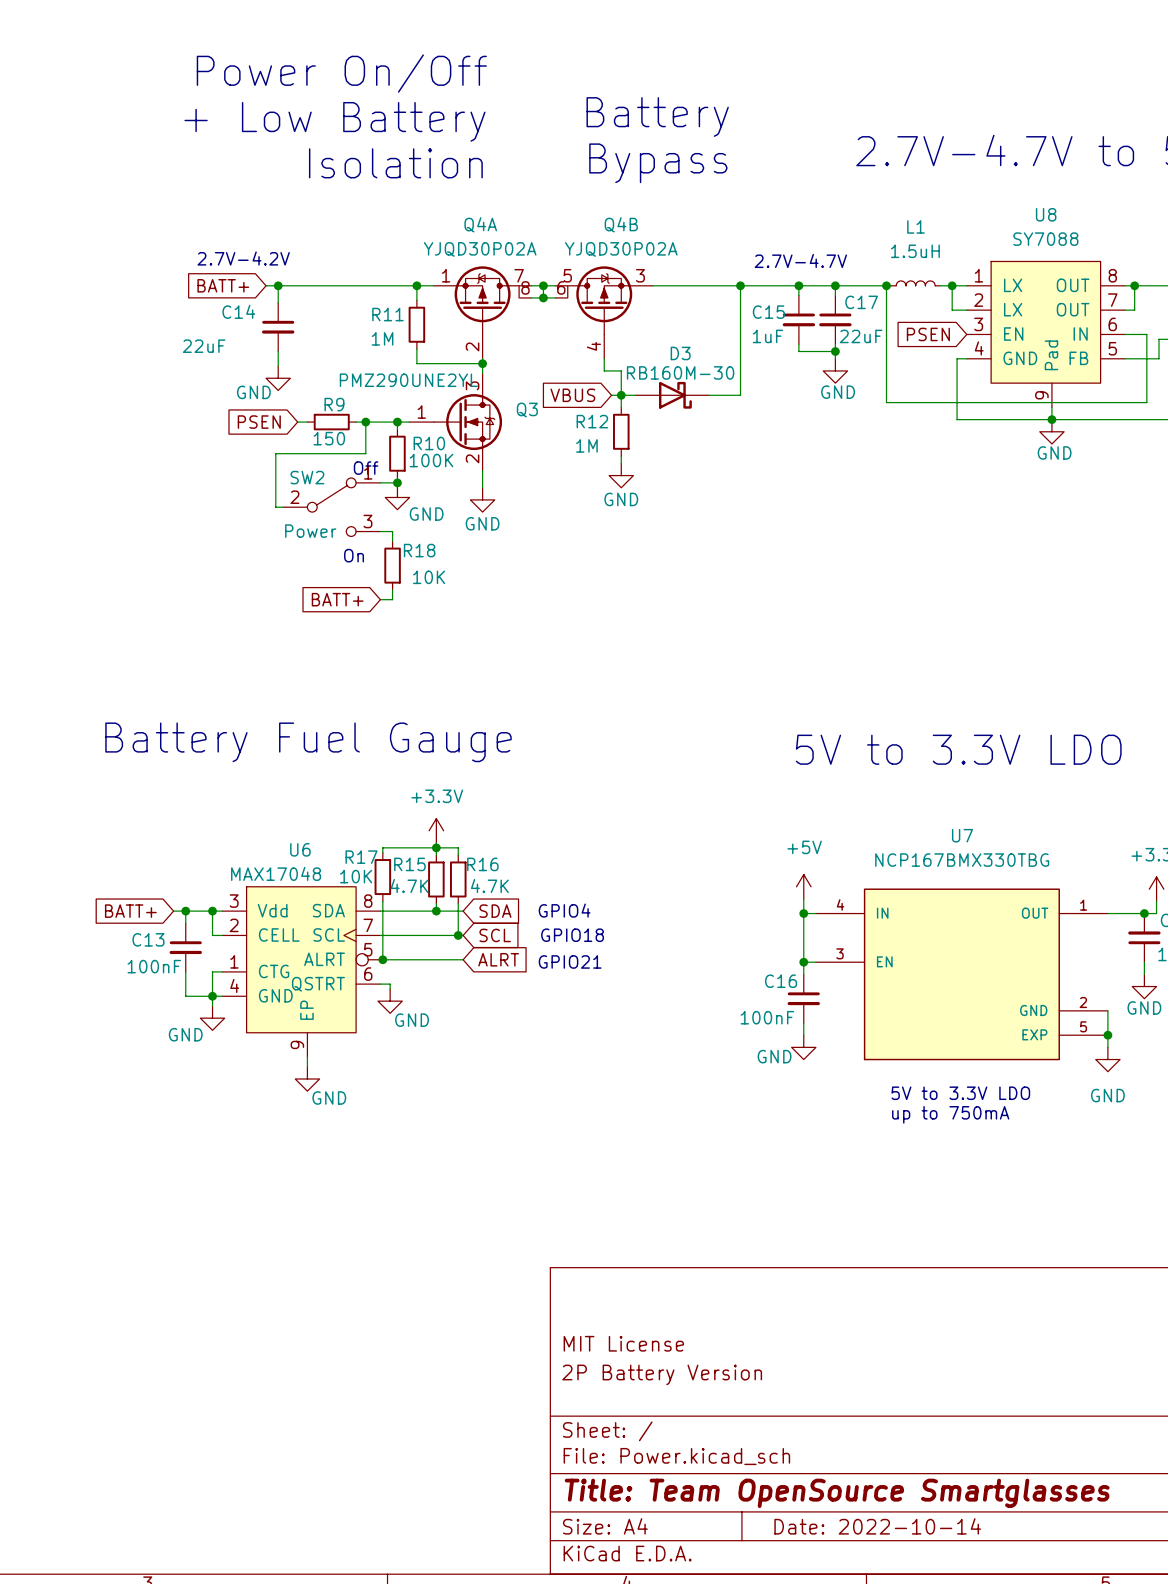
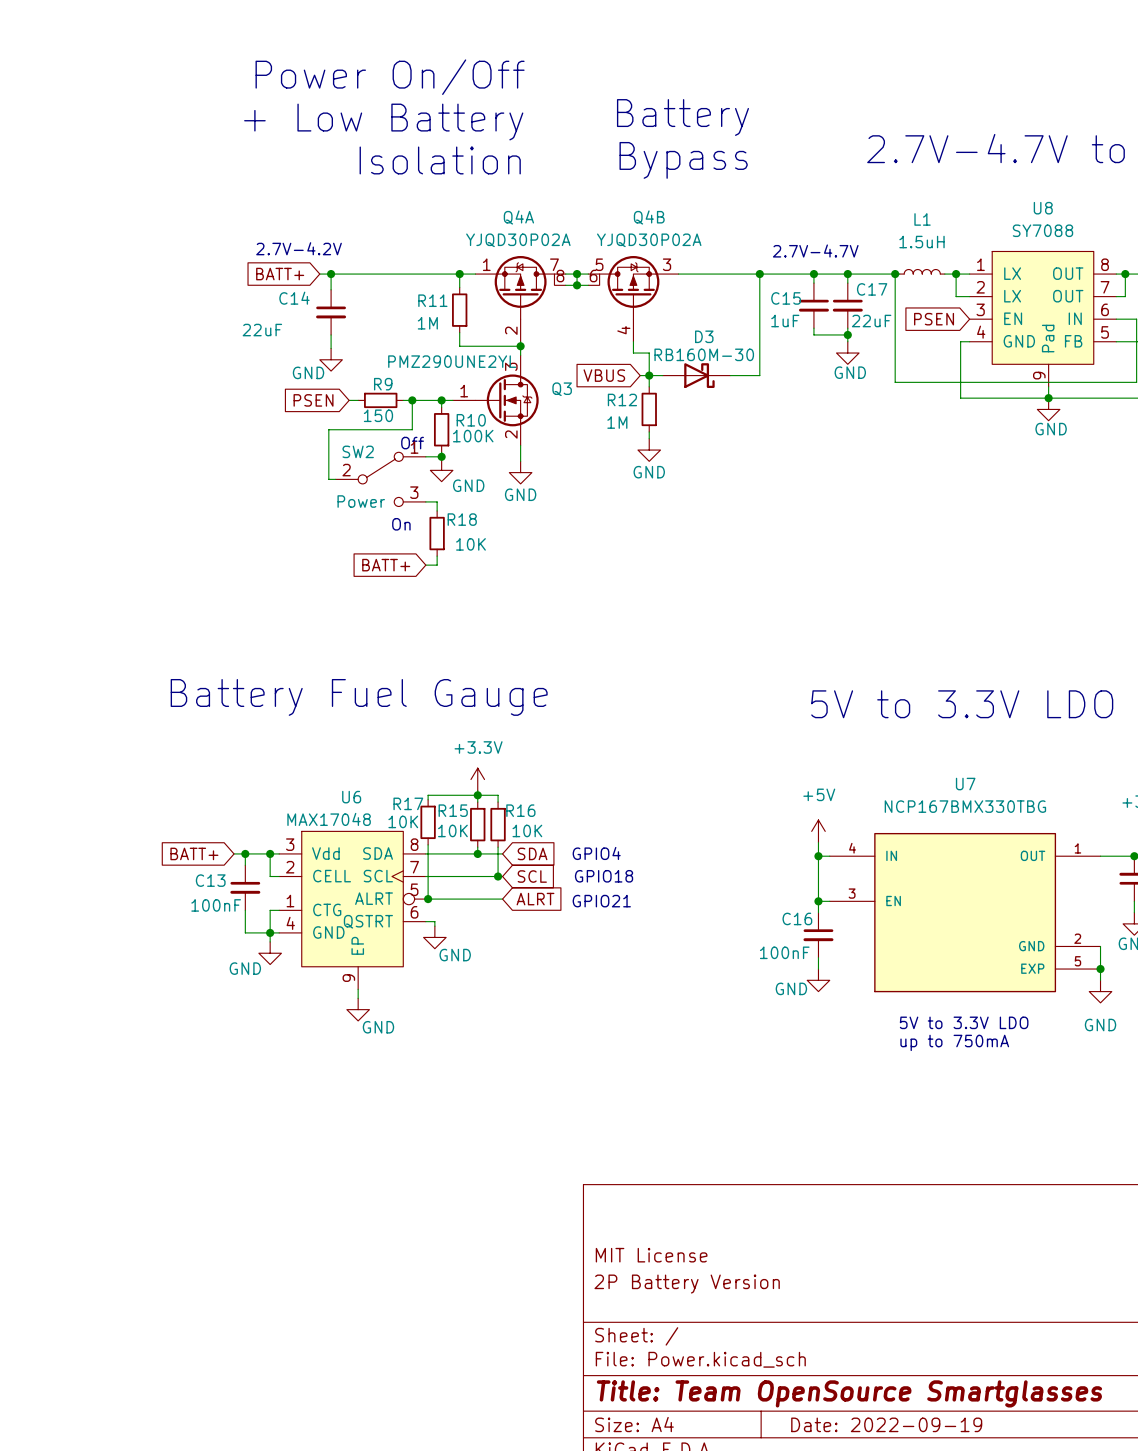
R15 value: 4.7K (409, 886) -> 10K (452, 830)
R16 value: 4.7K (489, 886) -> 10K (527, 830)
title block: Date: 2022-10-14 (877, 1526) -> Date: 2022-09-19 (886, 1424)

